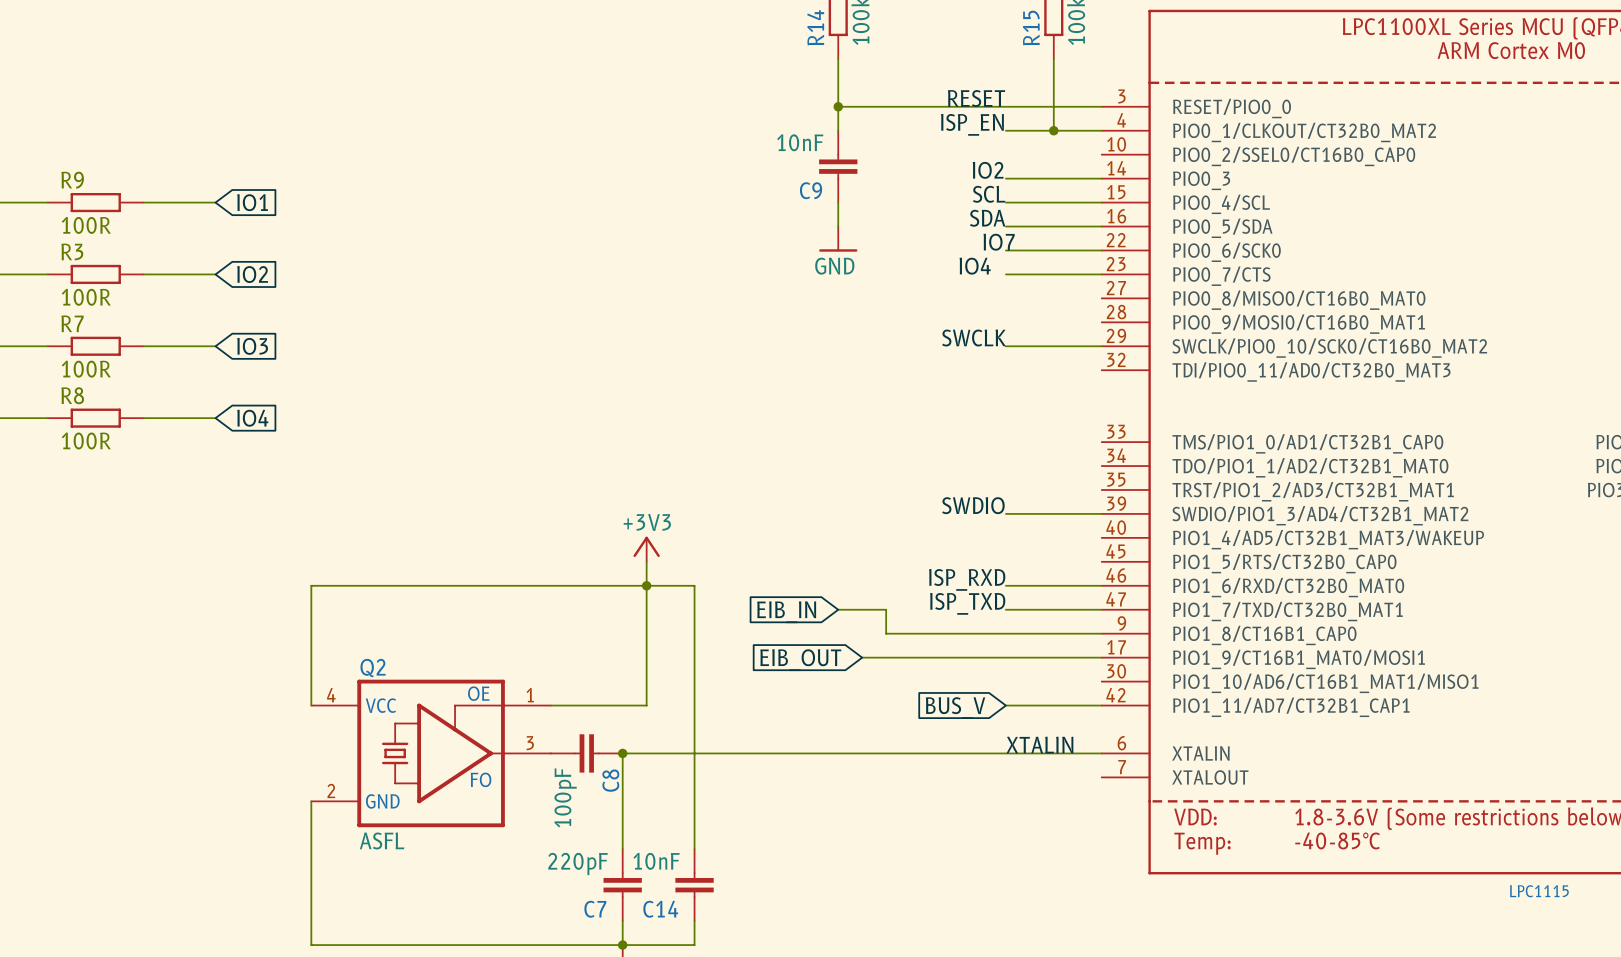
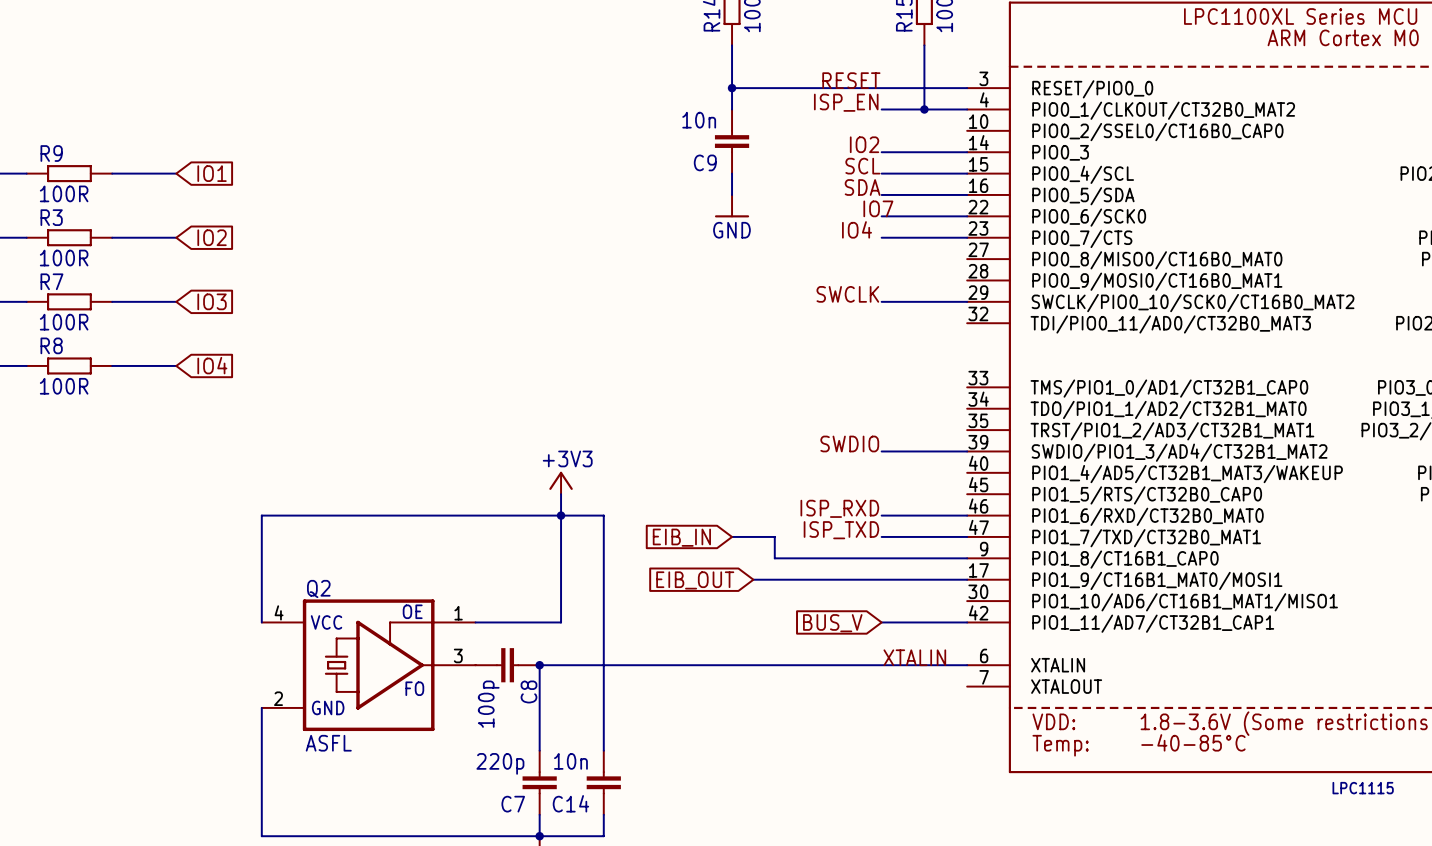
C9 value: 10nF (800, 142) -> 10n (699, 120)
C8 value: 100pF (565, 797) -> 100p (488, 704)
C14 value: 10nF (656, 861) -> 10n (570, 761)
C7 value: 220pF (578, 864) -> 220p (500, 763)

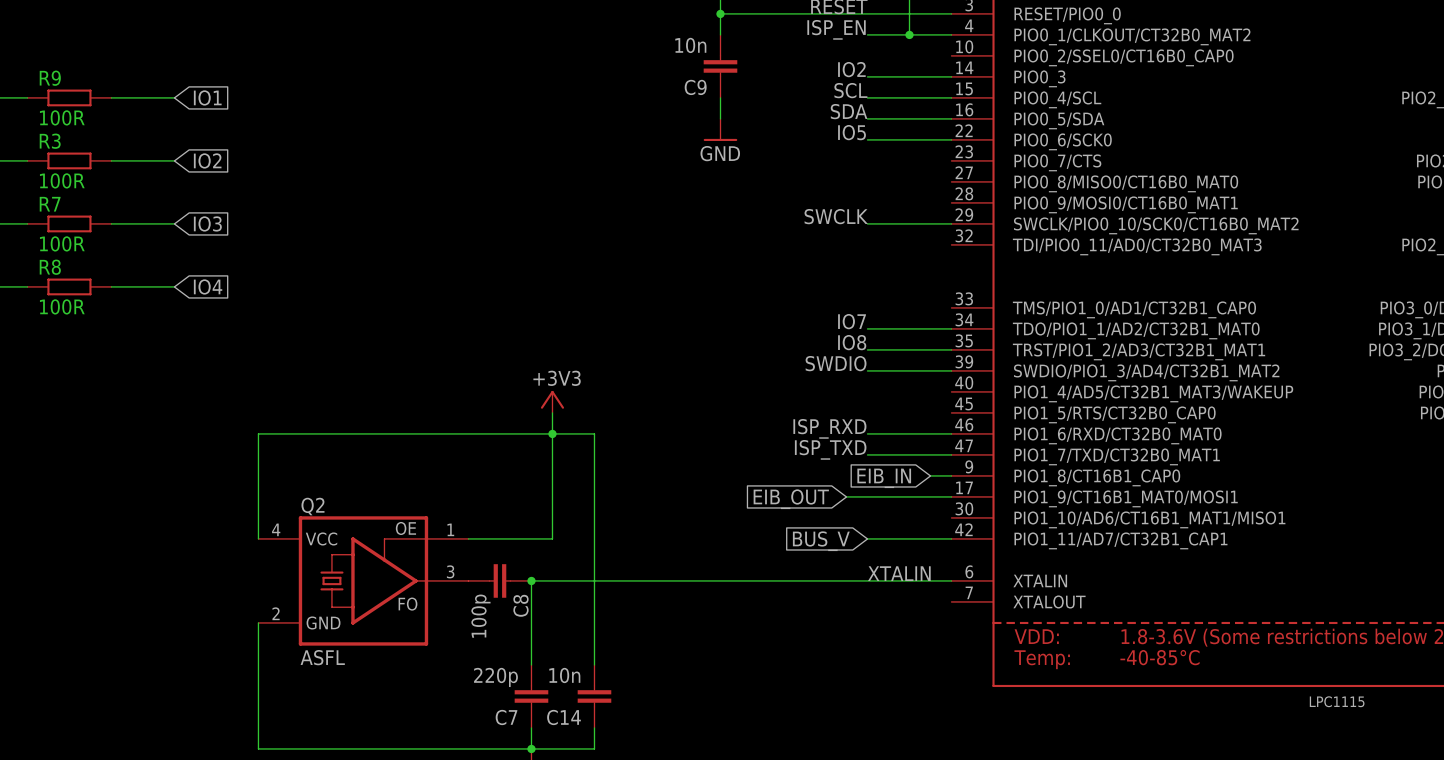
label position: IO7 (878, 208) -> IO7 (852, 321)
label: IO4 (857, 229) -> IO5 (852, 132)
wire: (881, 237) (967, 237) -> (867, 328) (951, 328)
label: none -> IO8 (852, 342)
wire: none -> (867, 349) (951, 349)
wire: (732, 536) (774, 536) (774, 558) (945, 558) -> none
global label: EIB_IN (681, 537) -> none
global label: none -> EIB_IN (884, 478)
wire: (753, 579) (860, 579) -> none
global label position: EIB_OUT (695, 580) -> EIB_OUT (791, 499)

